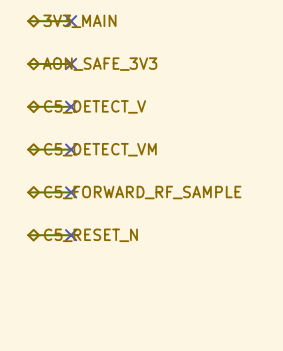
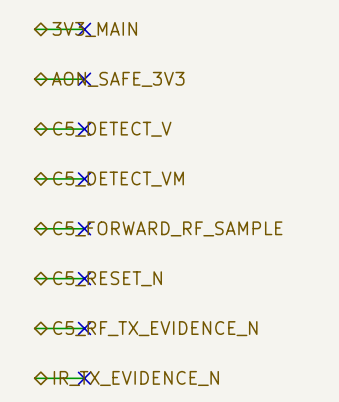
wire: none -> (34, 328) (84, 328)
no-connect mark: none -> (84, 328)
hierarchical label: none -> C5_RF_TX_EVIDENCE_N (155, 328)
wire: none -> (34, 378) (84, 378)
no-connect mark: none -> (84, 378)
hierarchical label: none -> IR_TX_EVIDENCE_N (136, 378)

